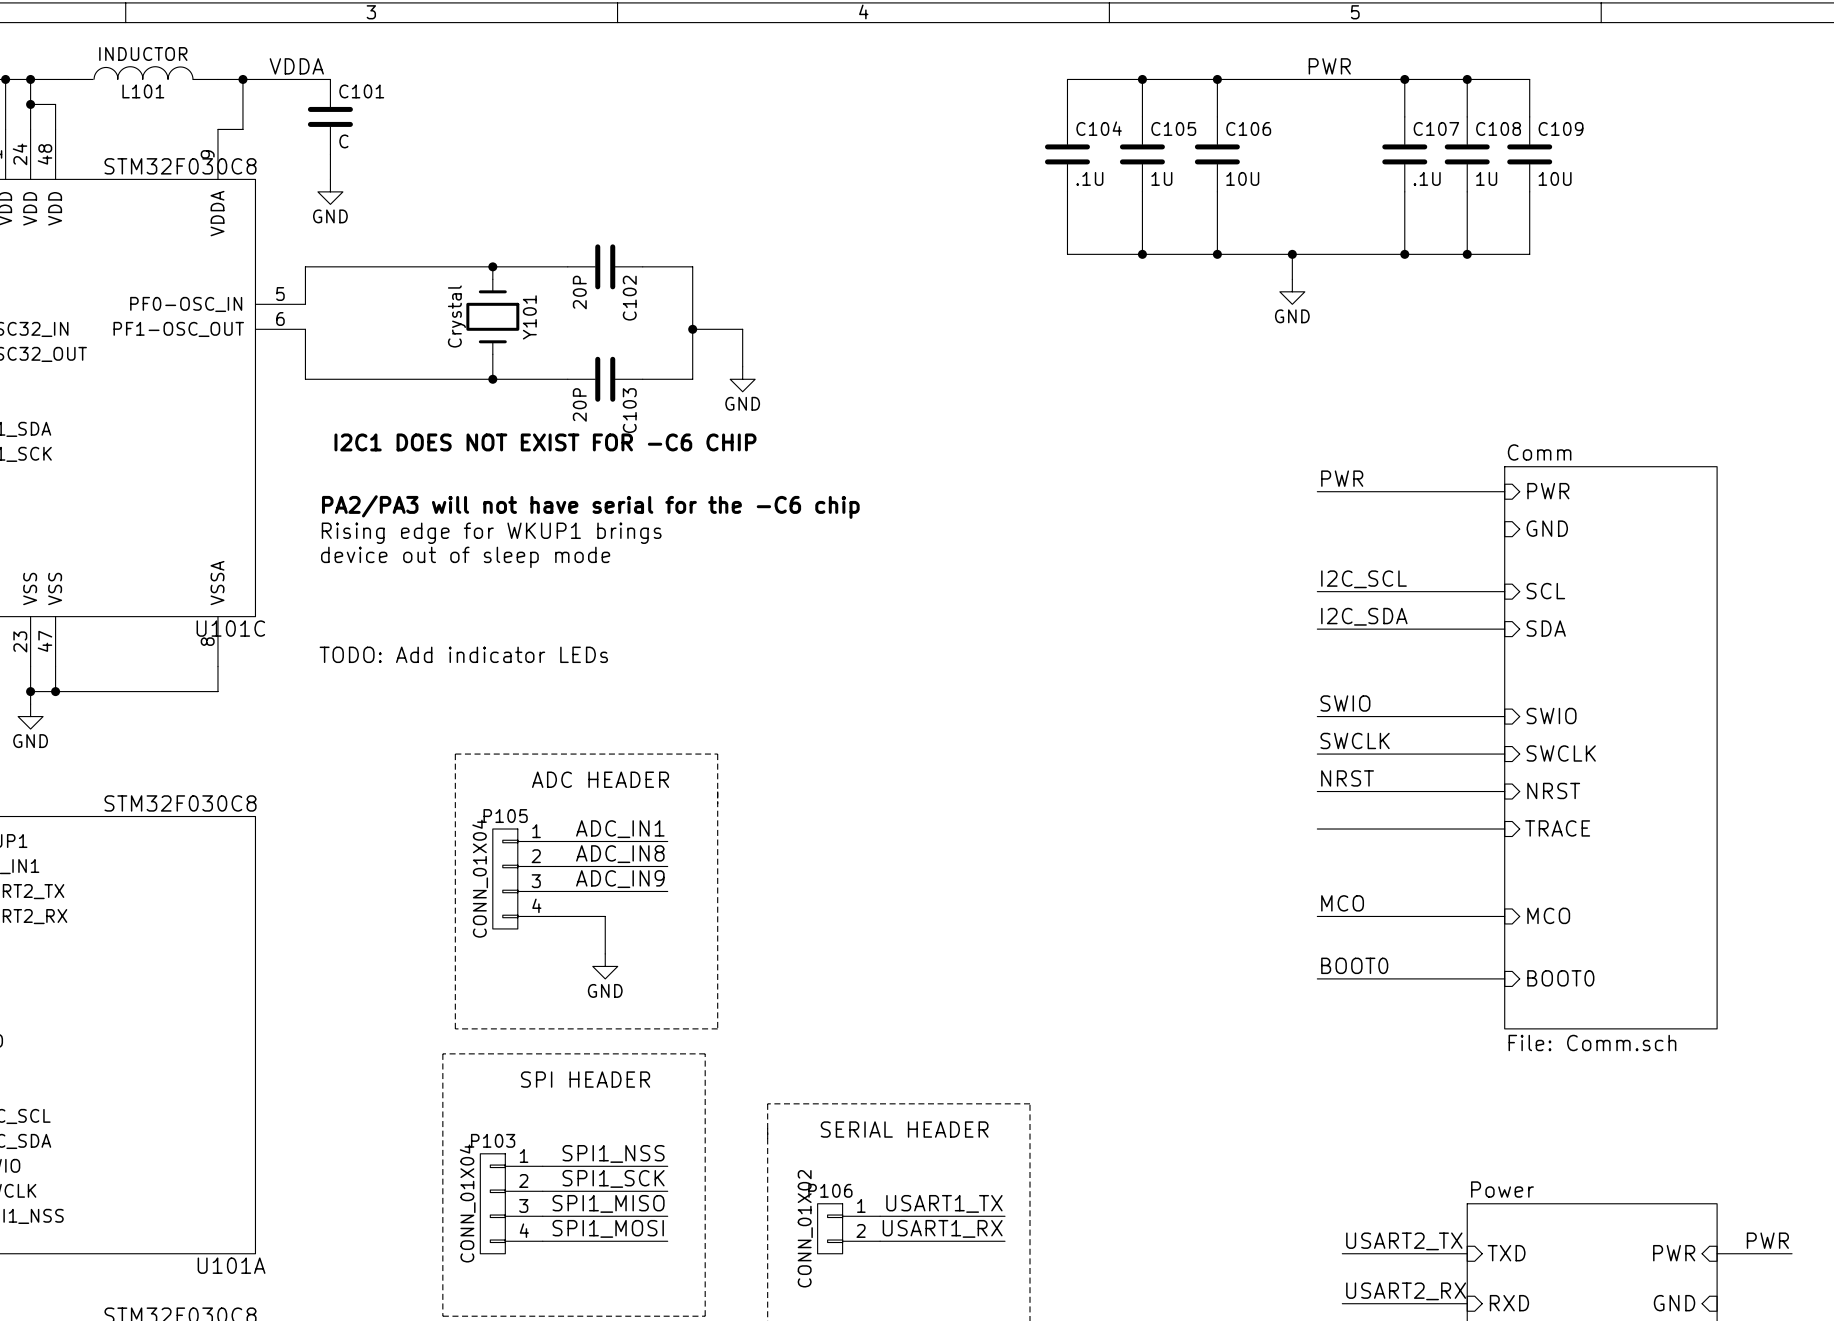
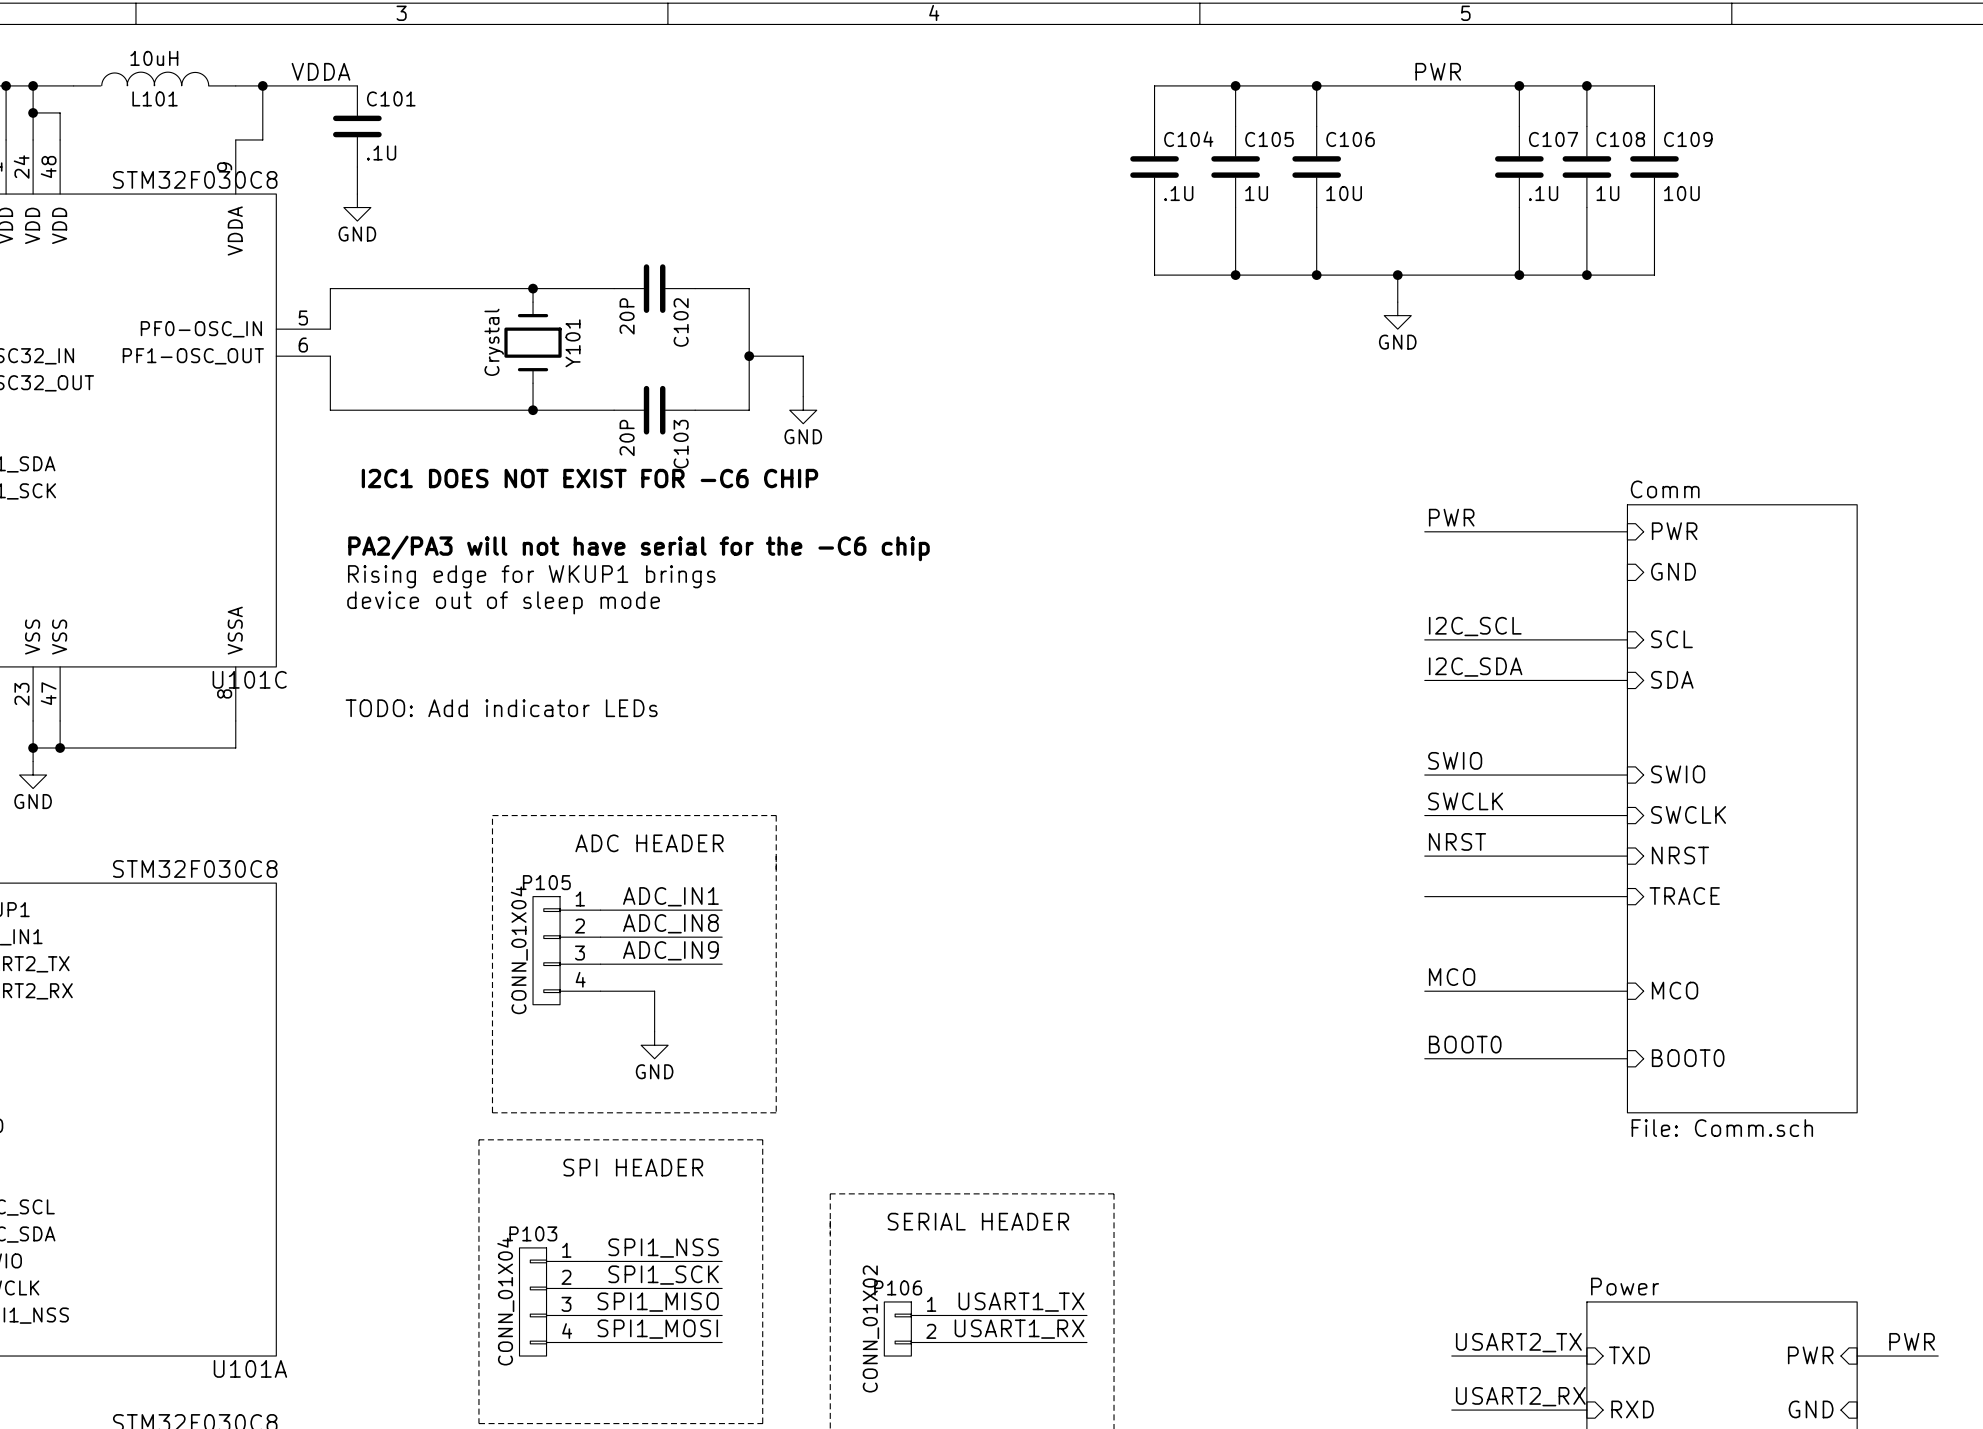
L101 value: INDUCTOR (143, 54) -> 10uH (154, 58)
C101 value: C (343, 141) -> .1U (381, 152)

